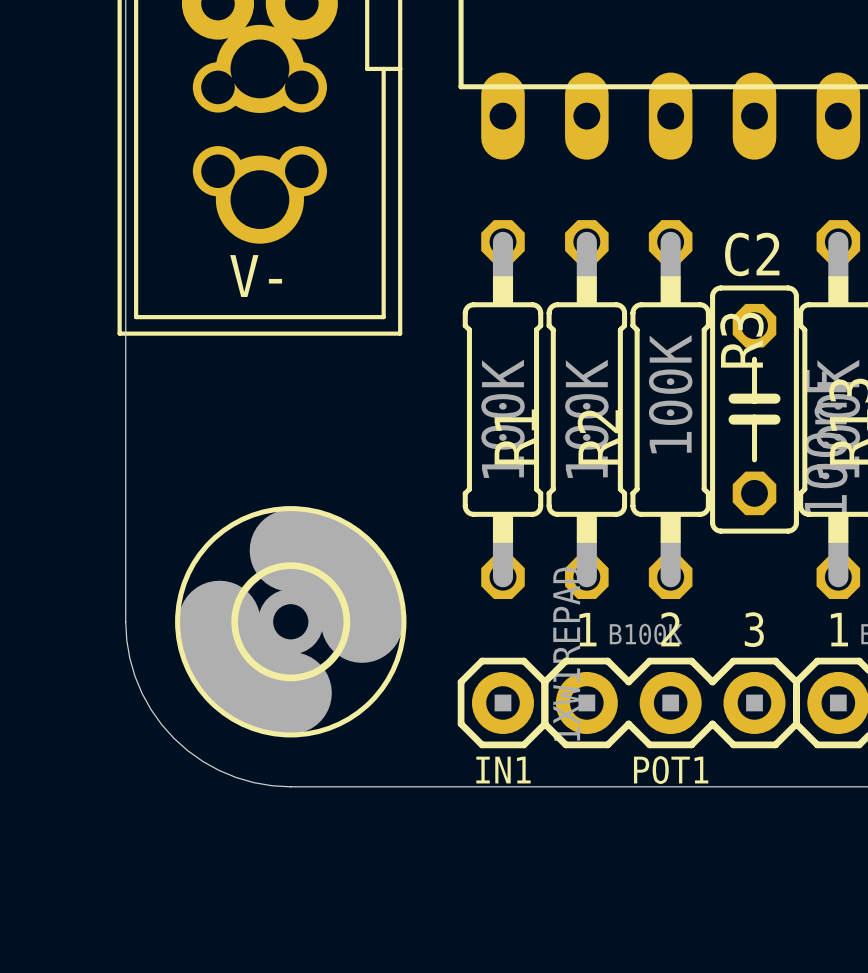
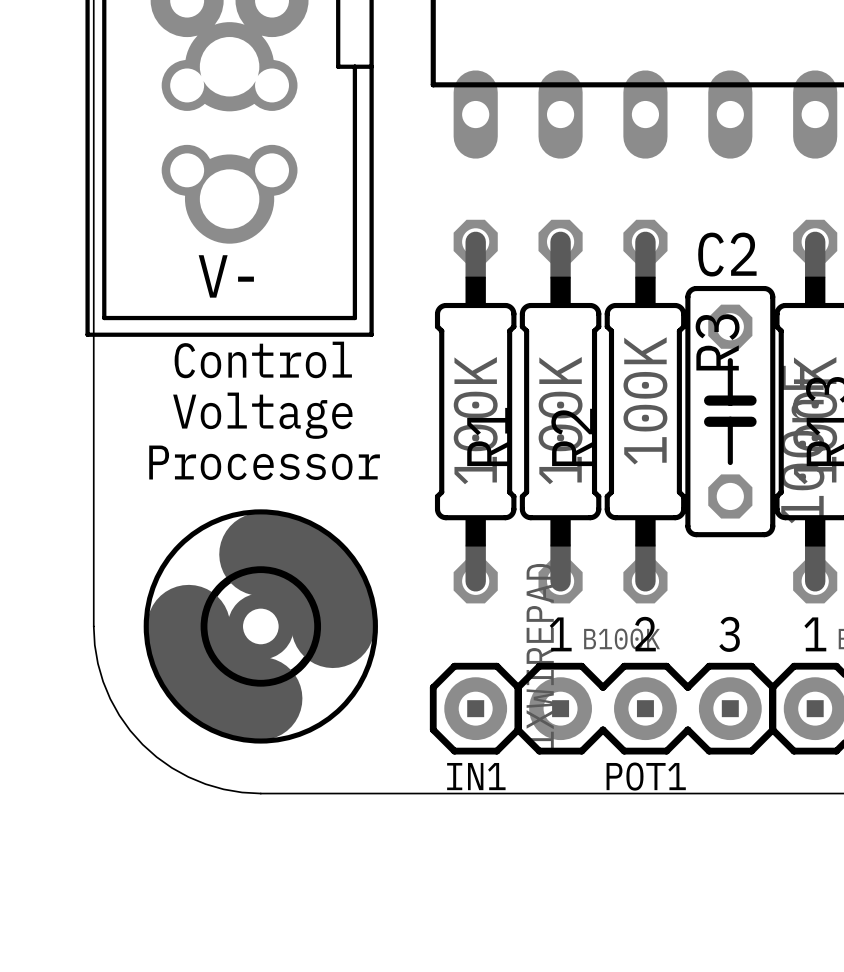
text: none -> Control (263, 359)
text: none -> Voltage (262, 415)
text: none -> Processor (264, 462)

